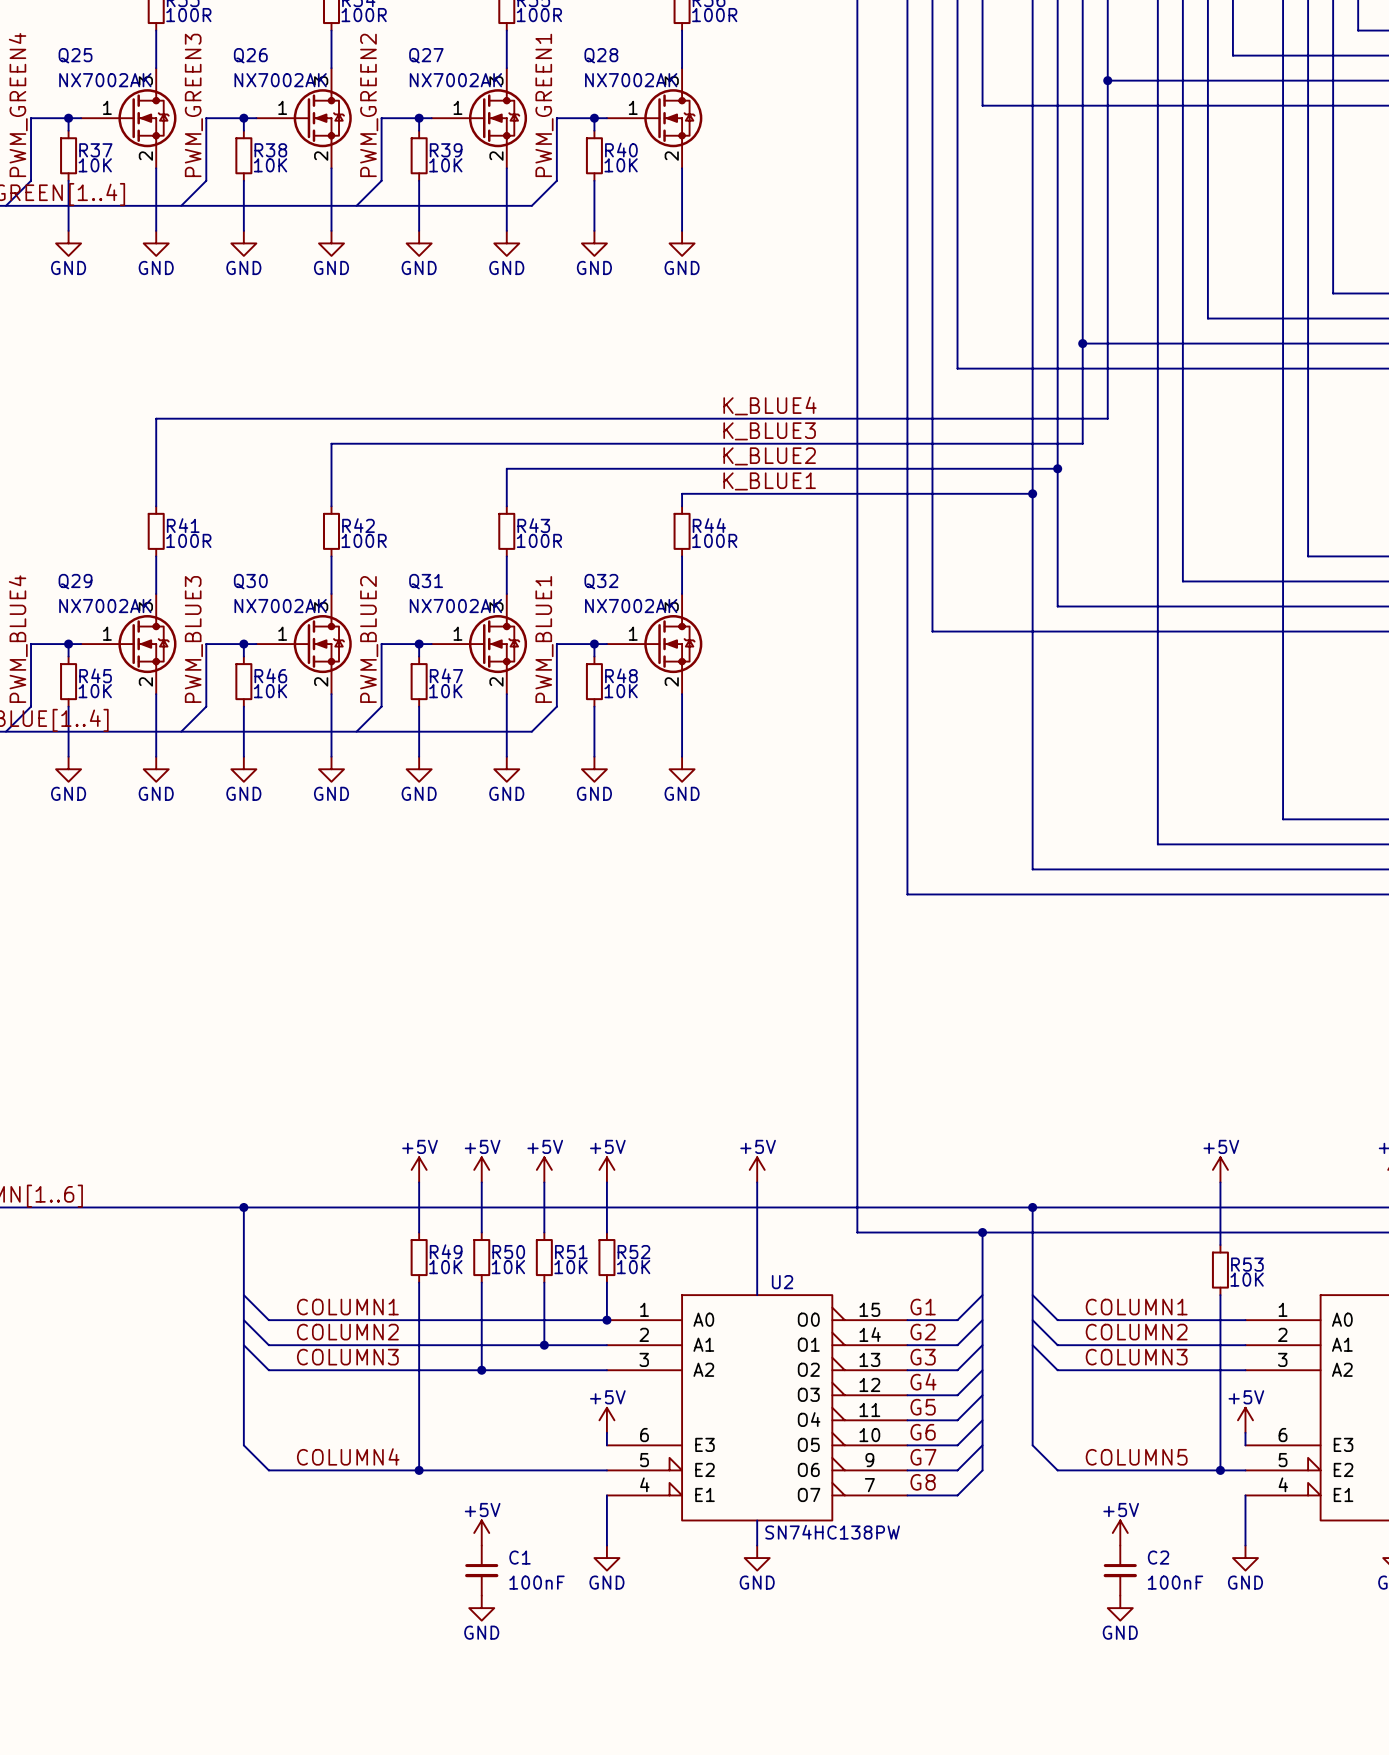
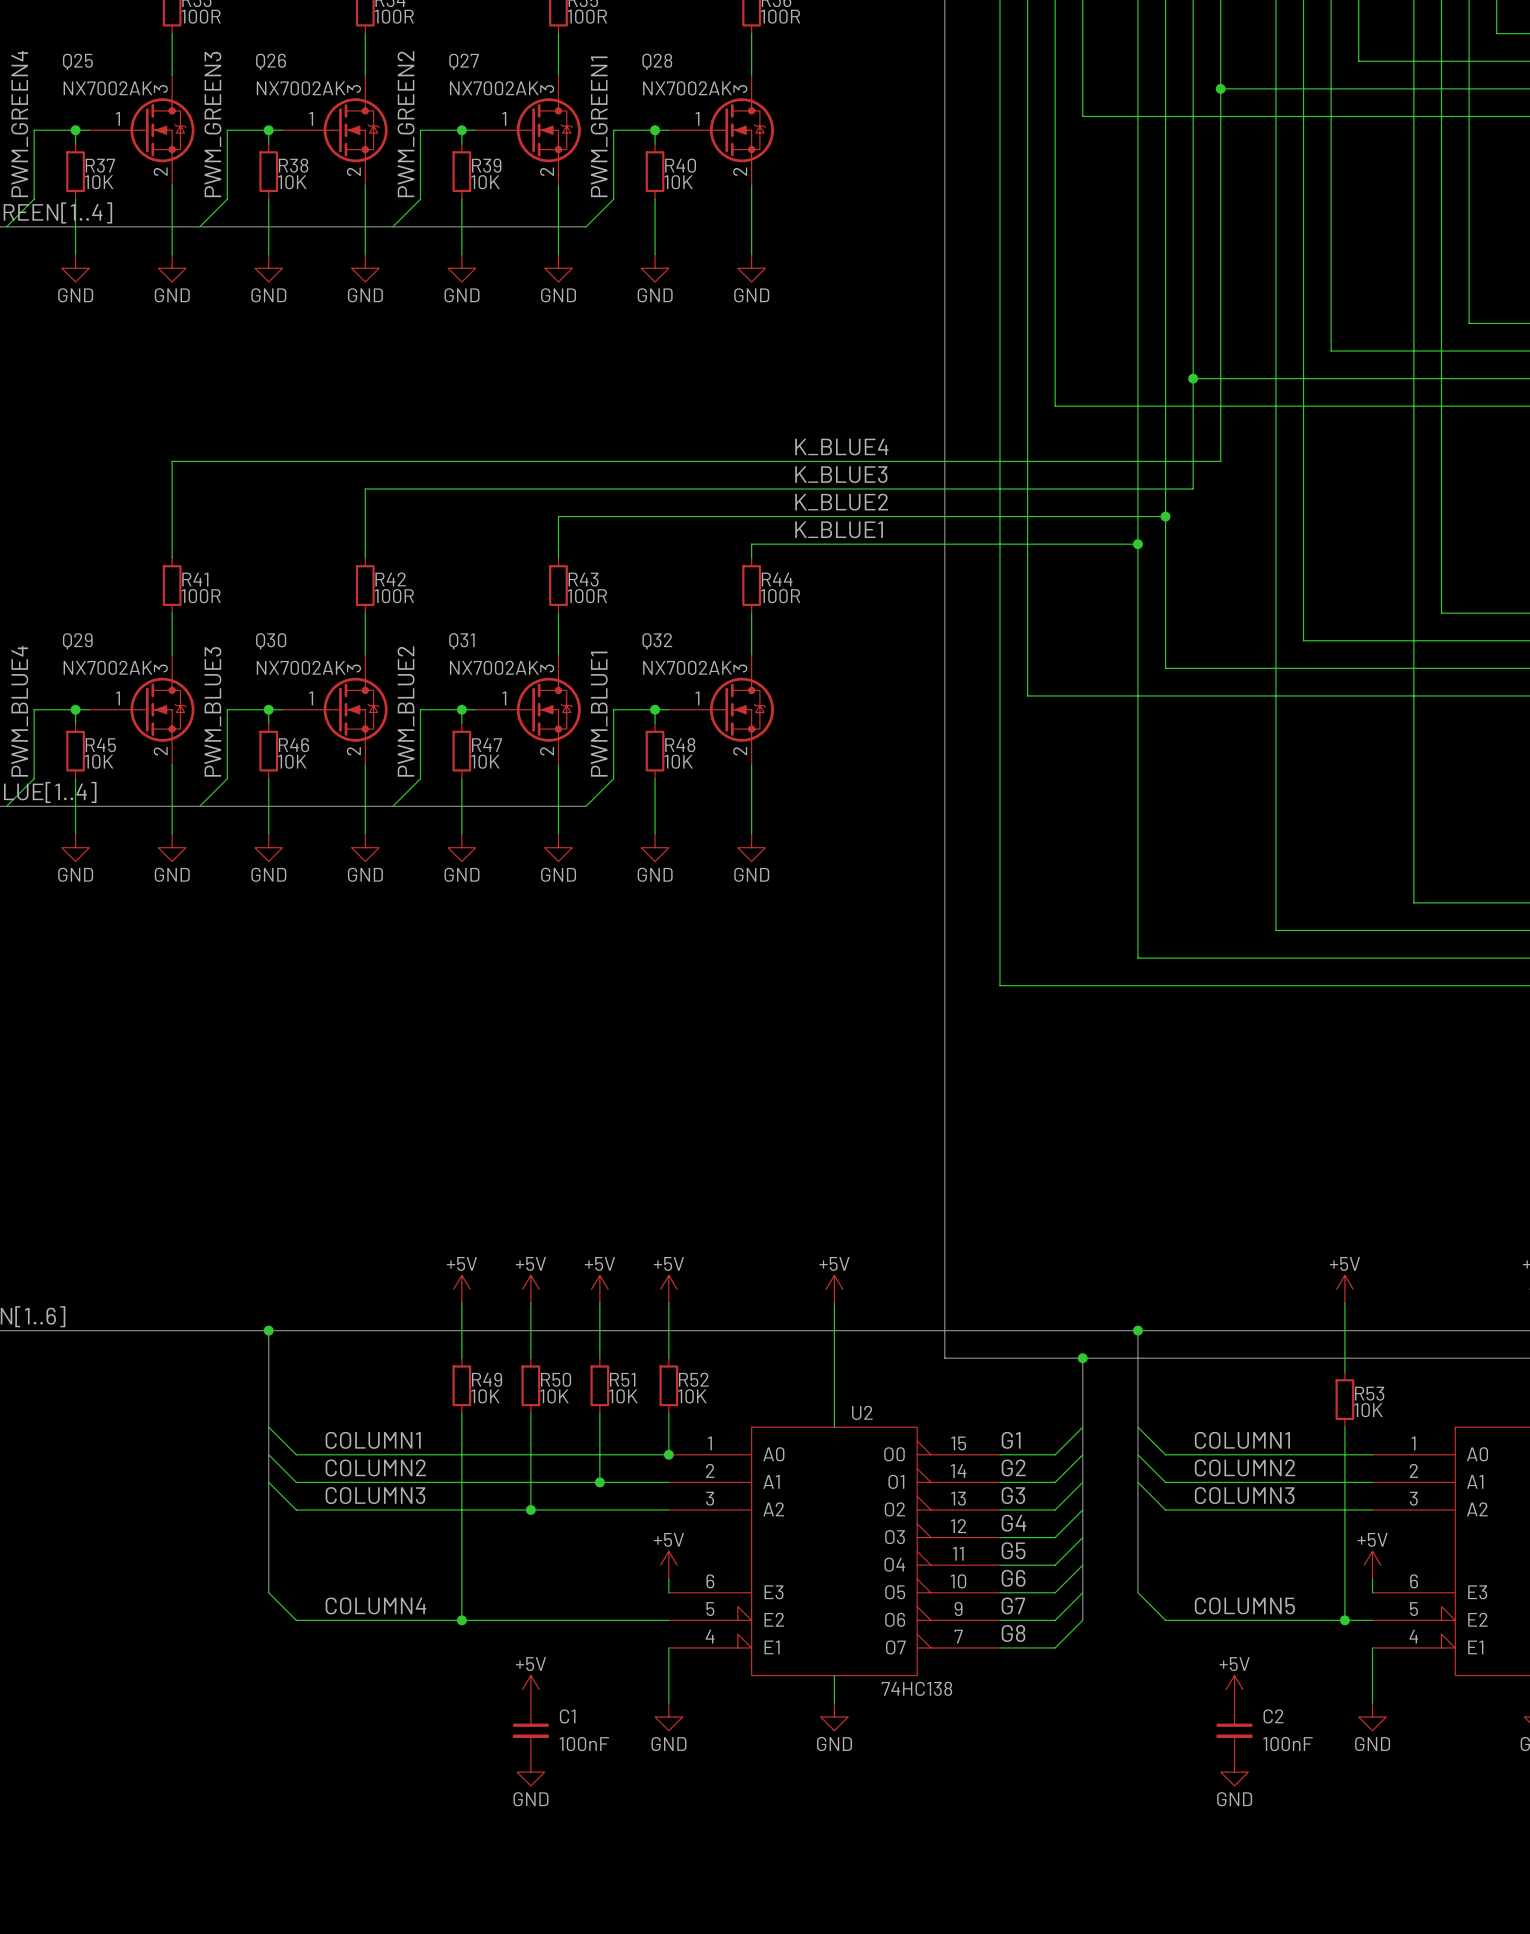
U2 value: SN74HC138PW (832, 1532) -> 74HC138 (916, 1688)

